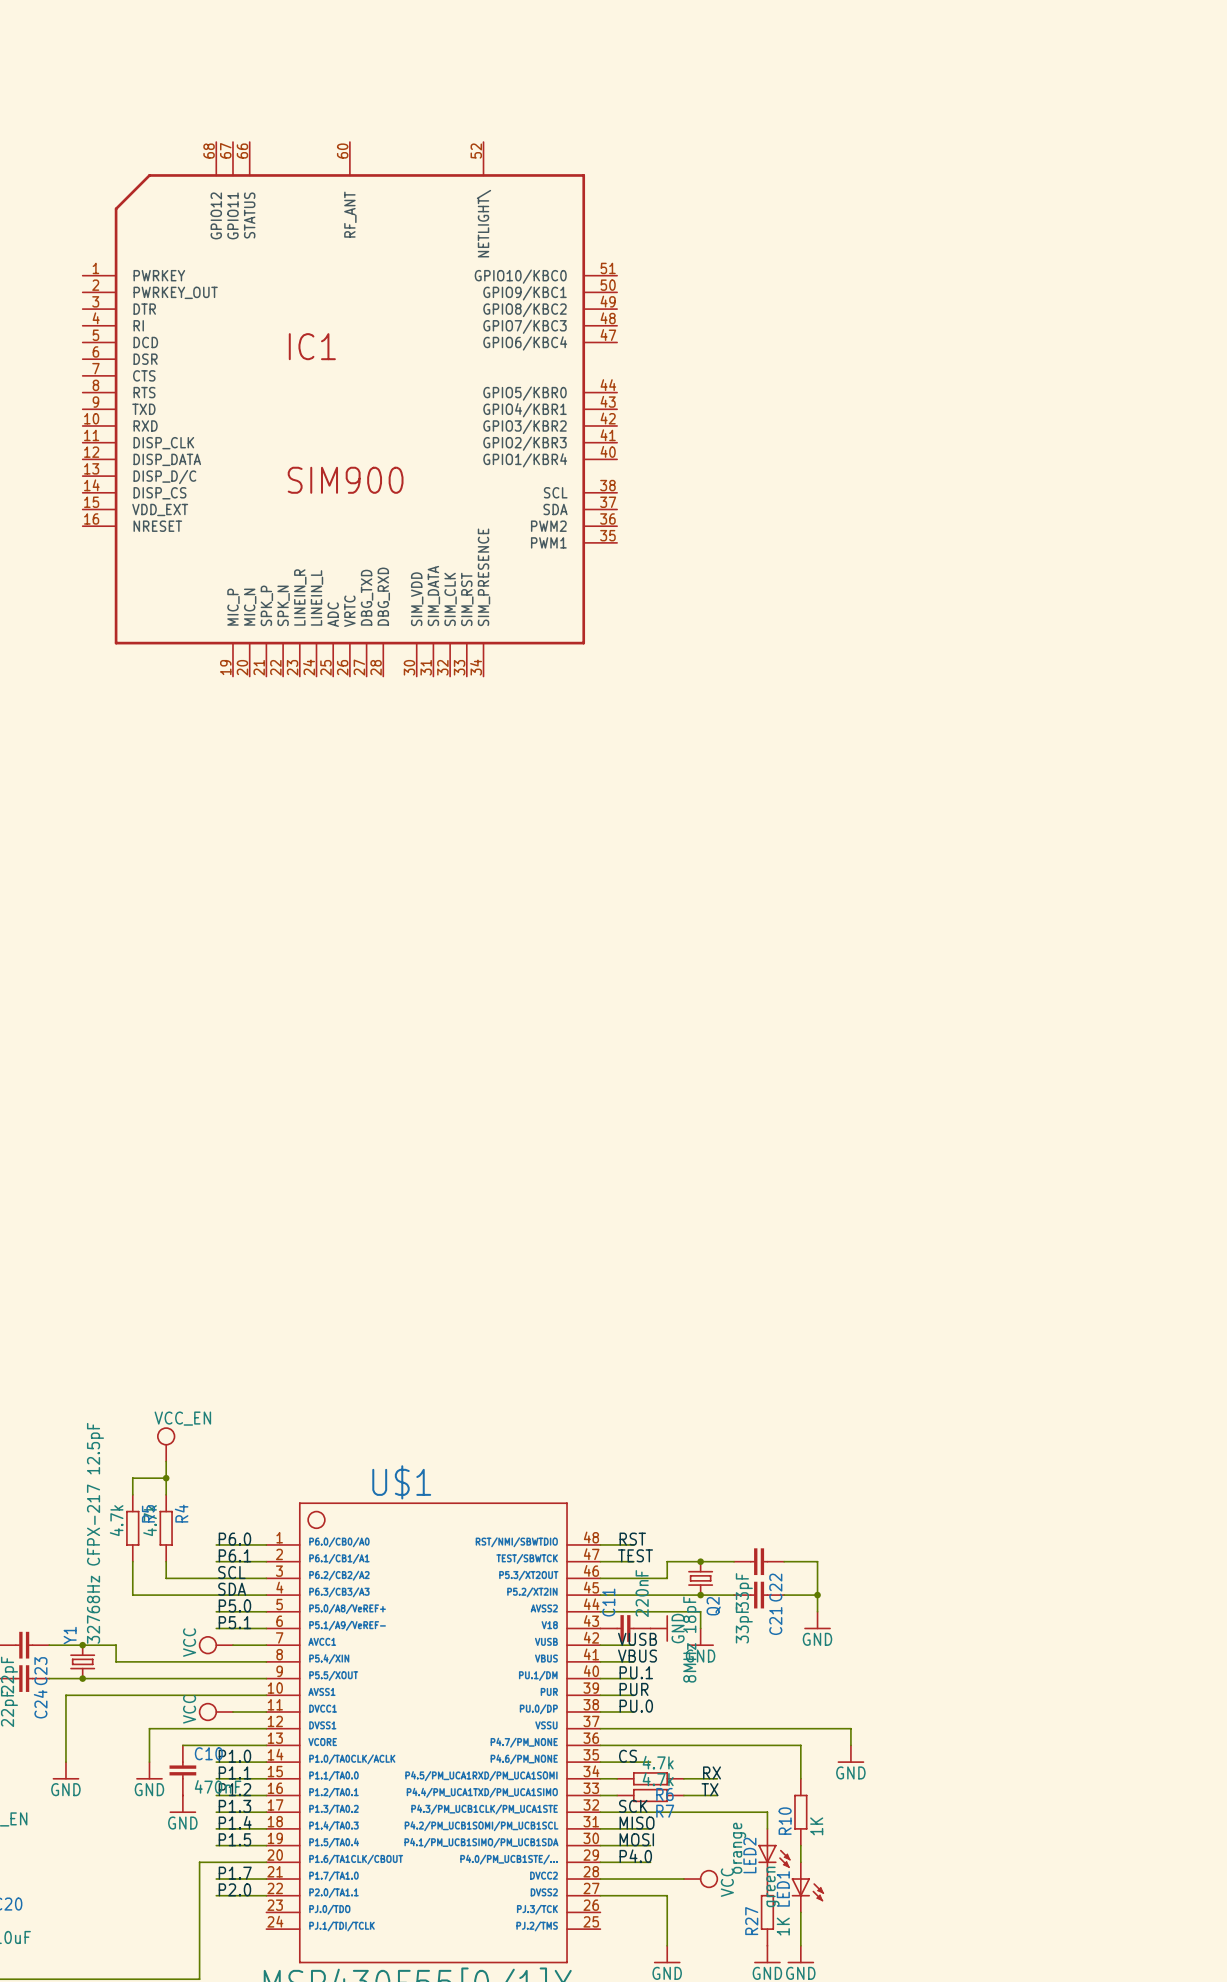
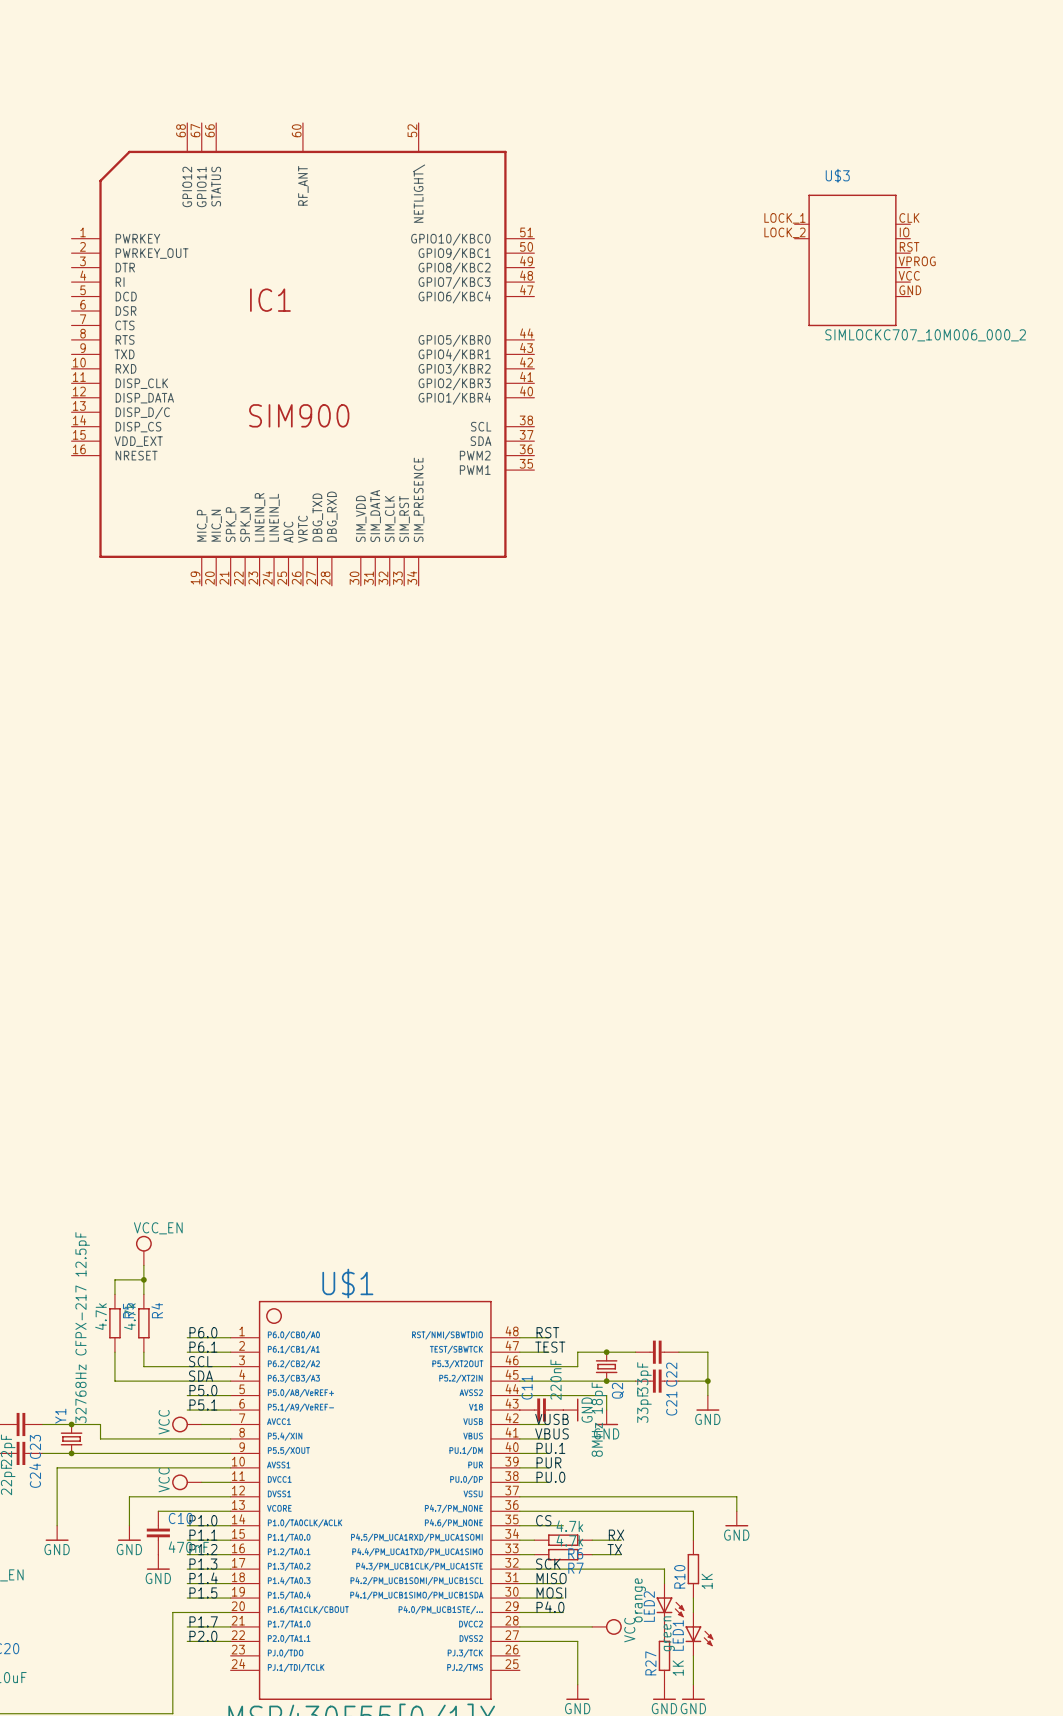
U$3: none -> SIMLOCKC707_10M006_000_2 (852, 260)

